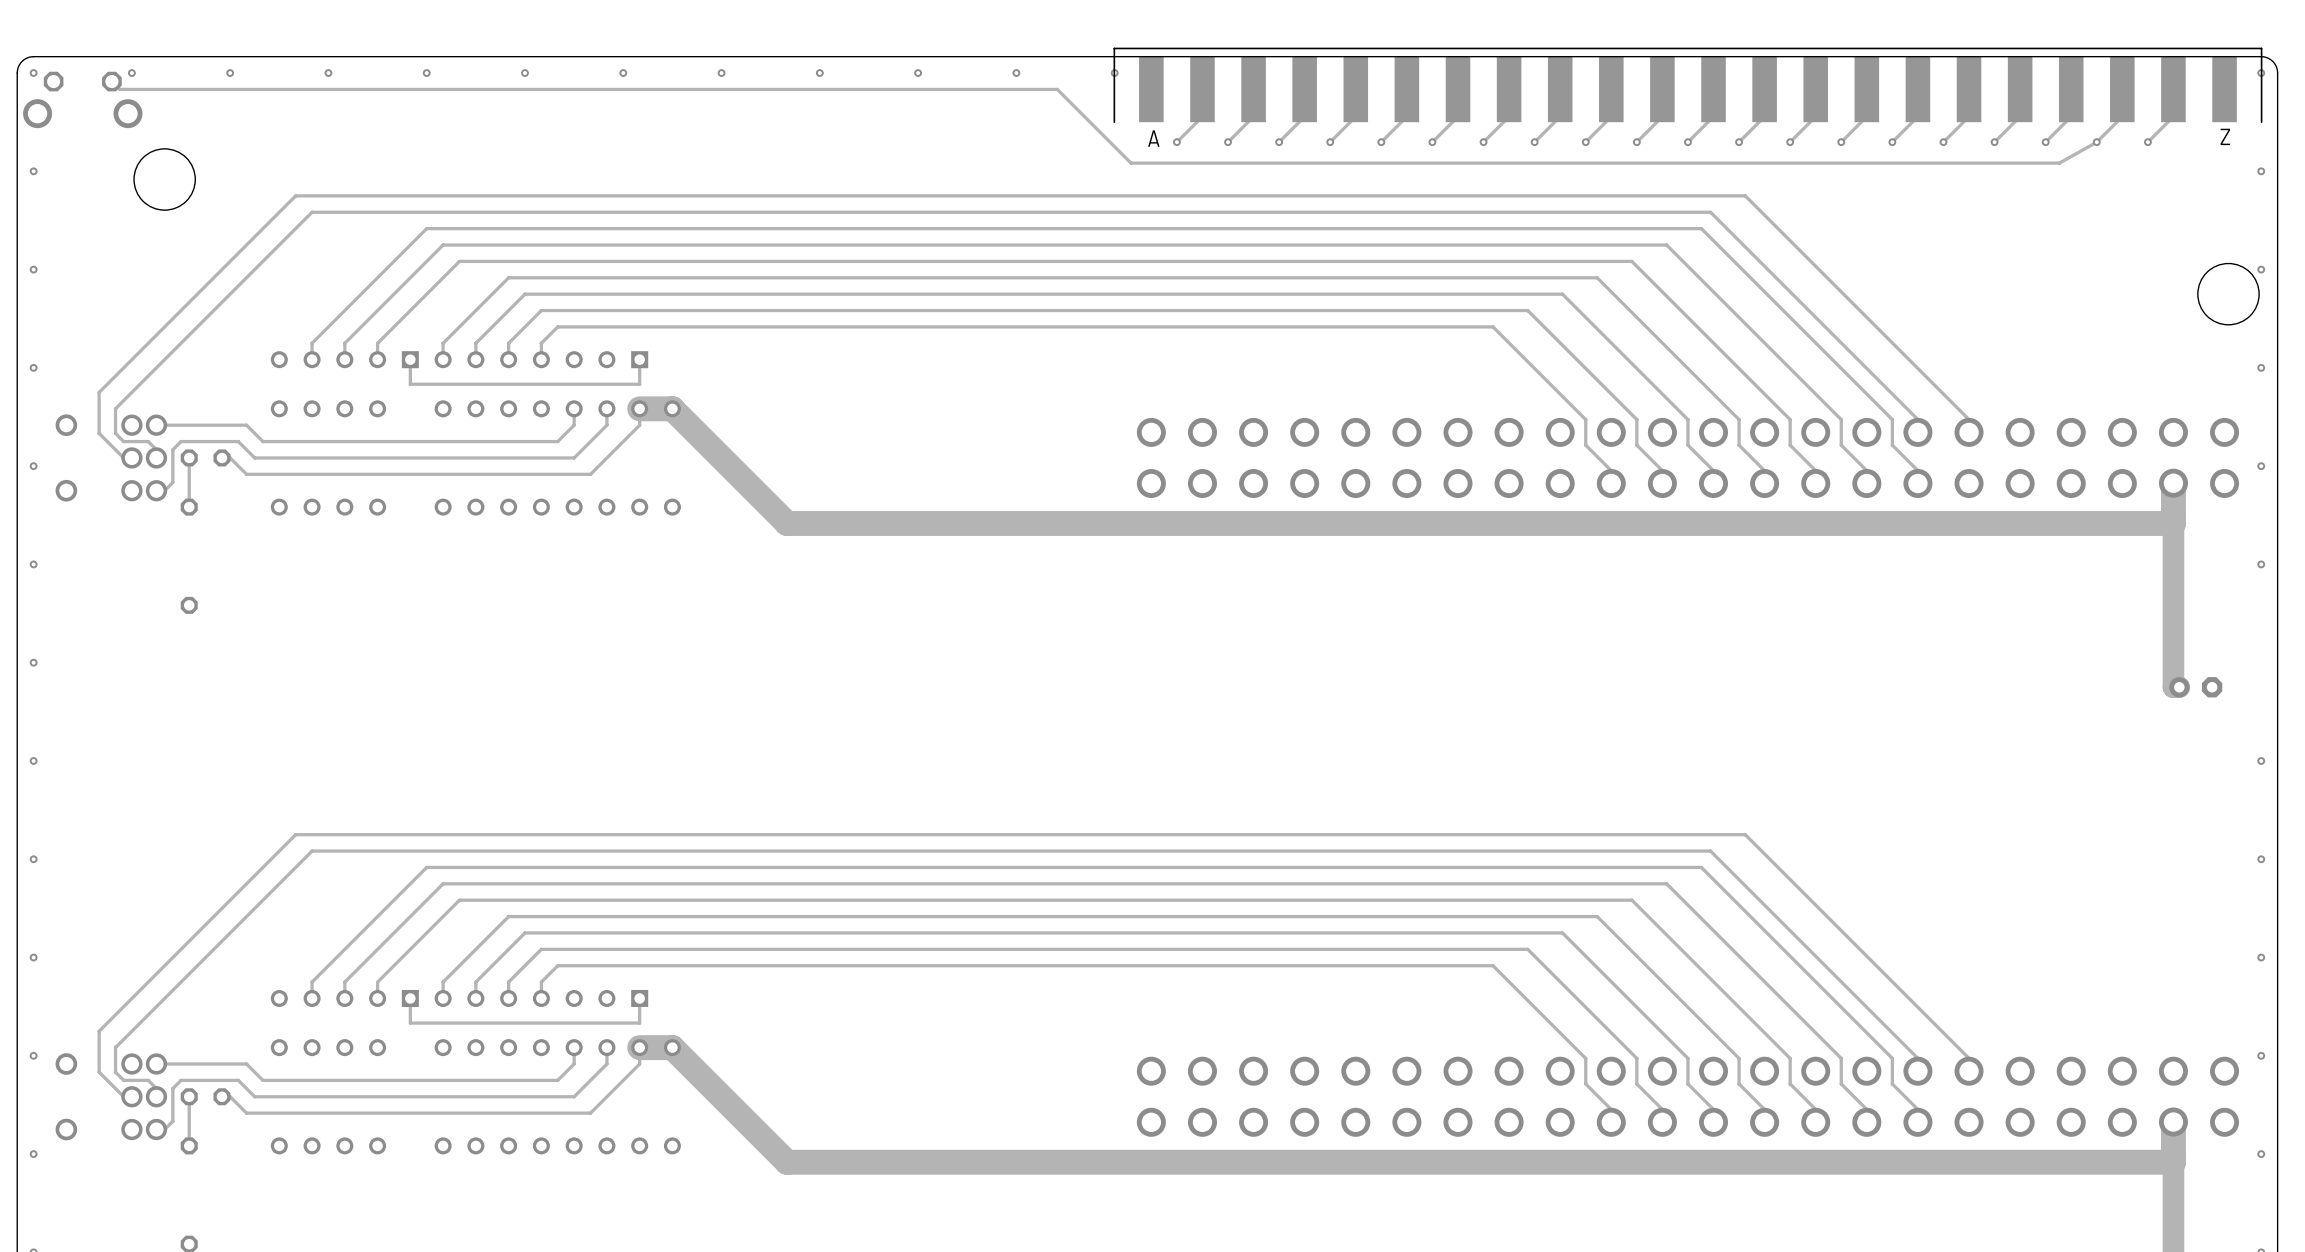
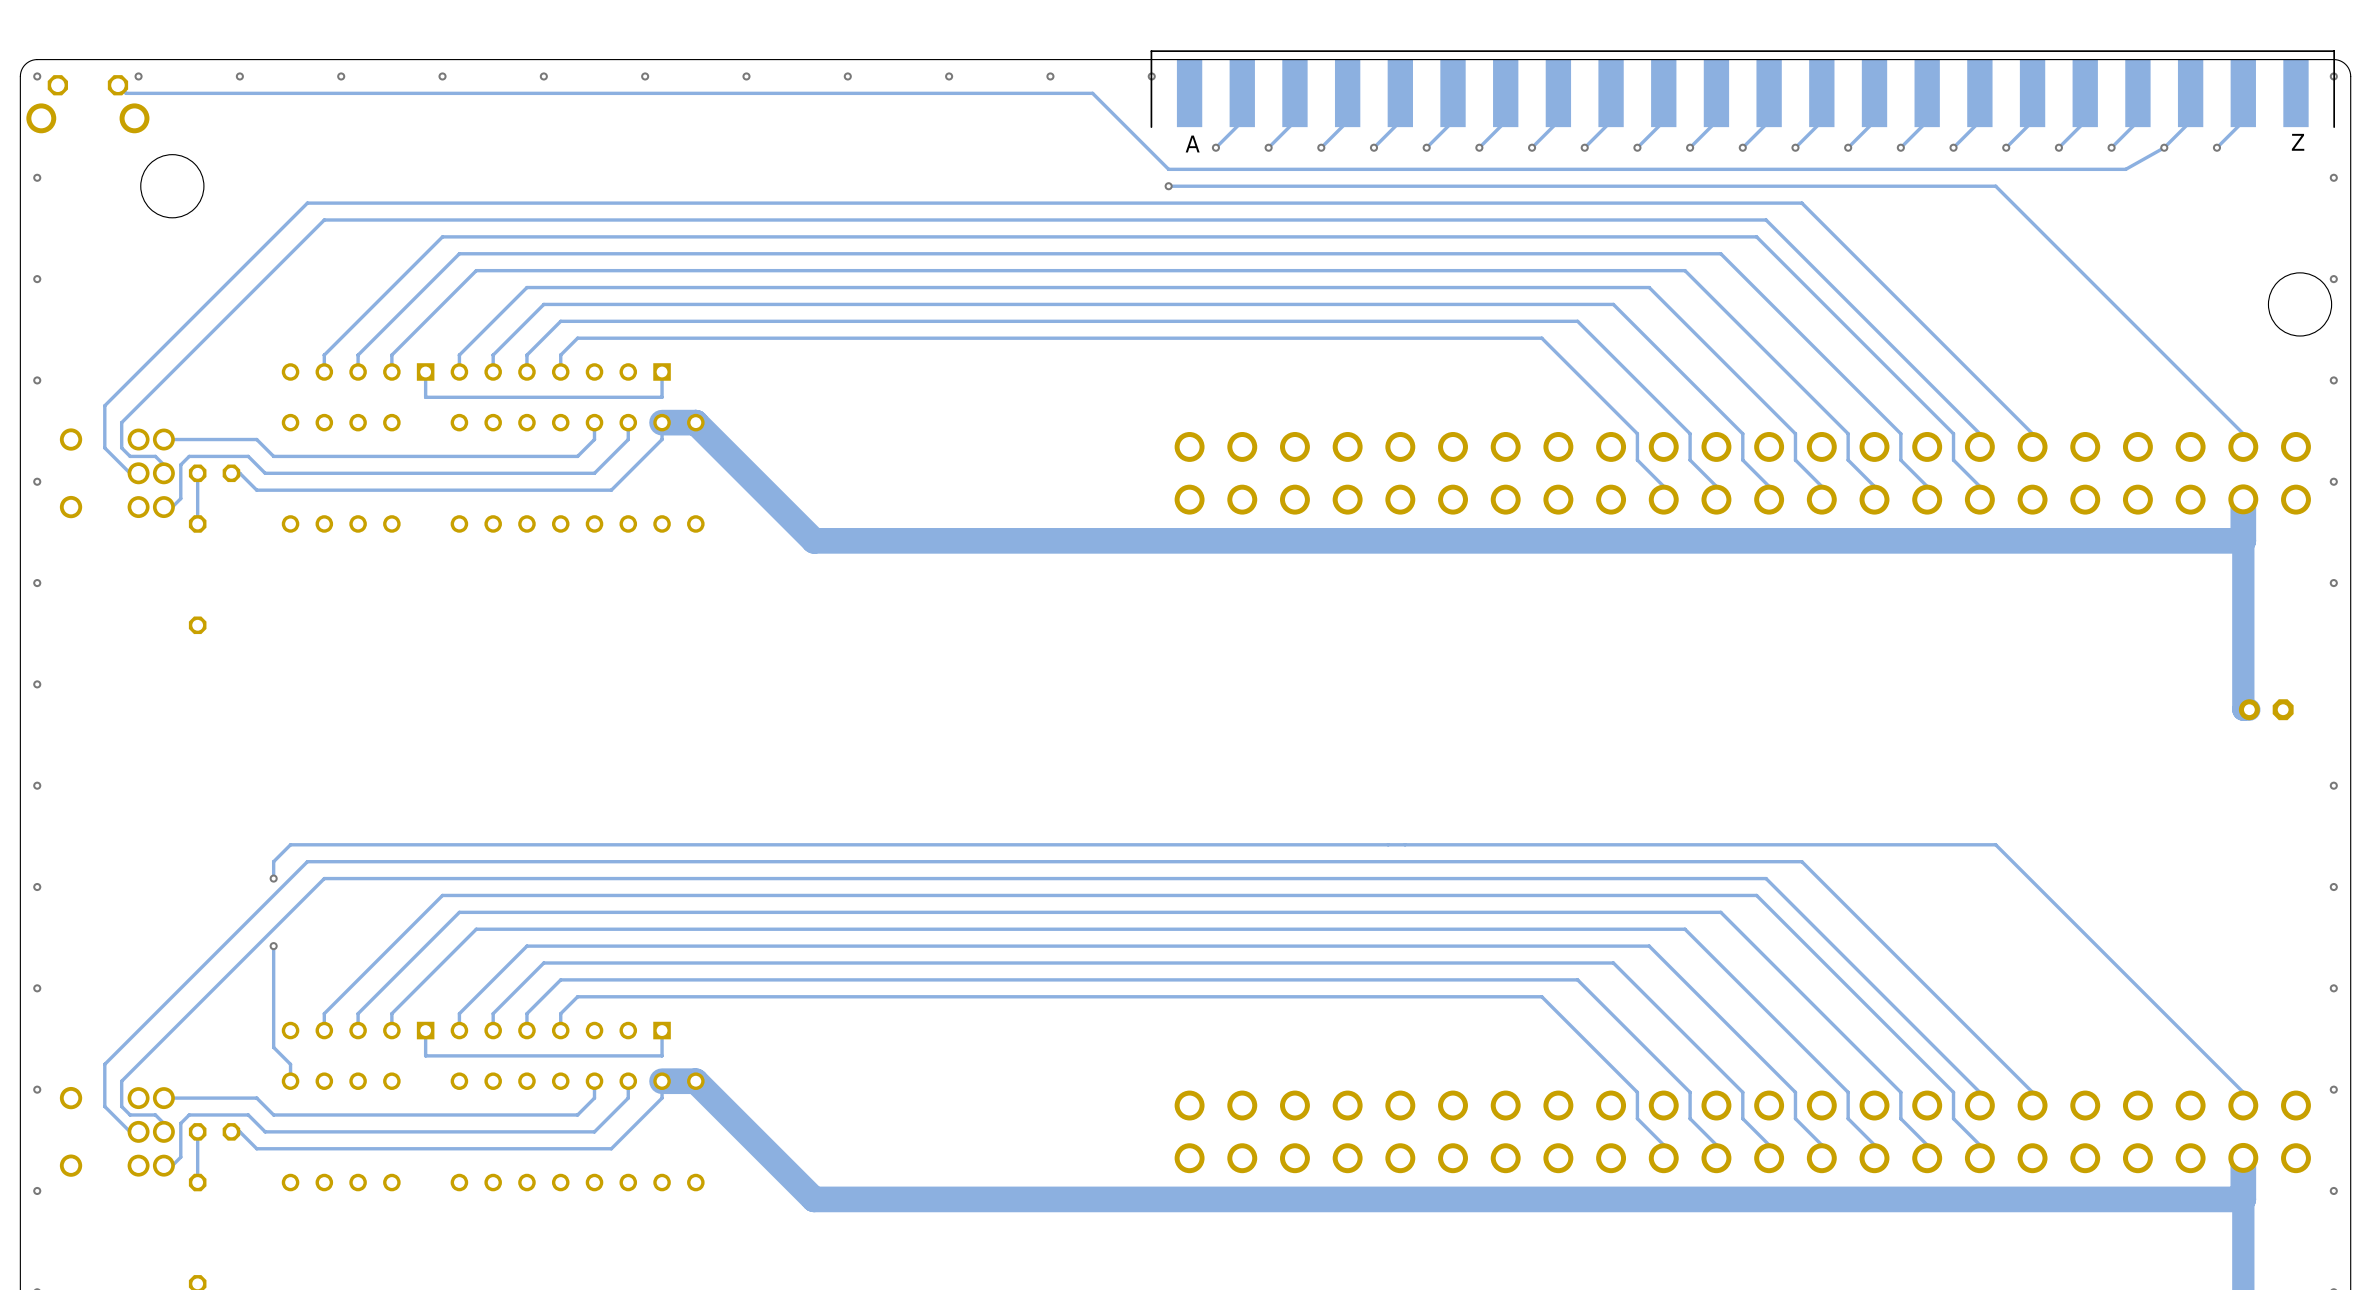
track: none -> (1168, 186) (1995, 186) (2243, 433) (2243, 446)
via: none -> (1168, 186)
track: none -> (273, 878) (273, 861) (290, 844) (1995, 844) (2243, 1092) (2243, 1105)
via: none -> (273, 878)
track: none -> (273, 946) (273, 1047) (290, 1064) (290, 1081)
via: none -> (273, 946)

